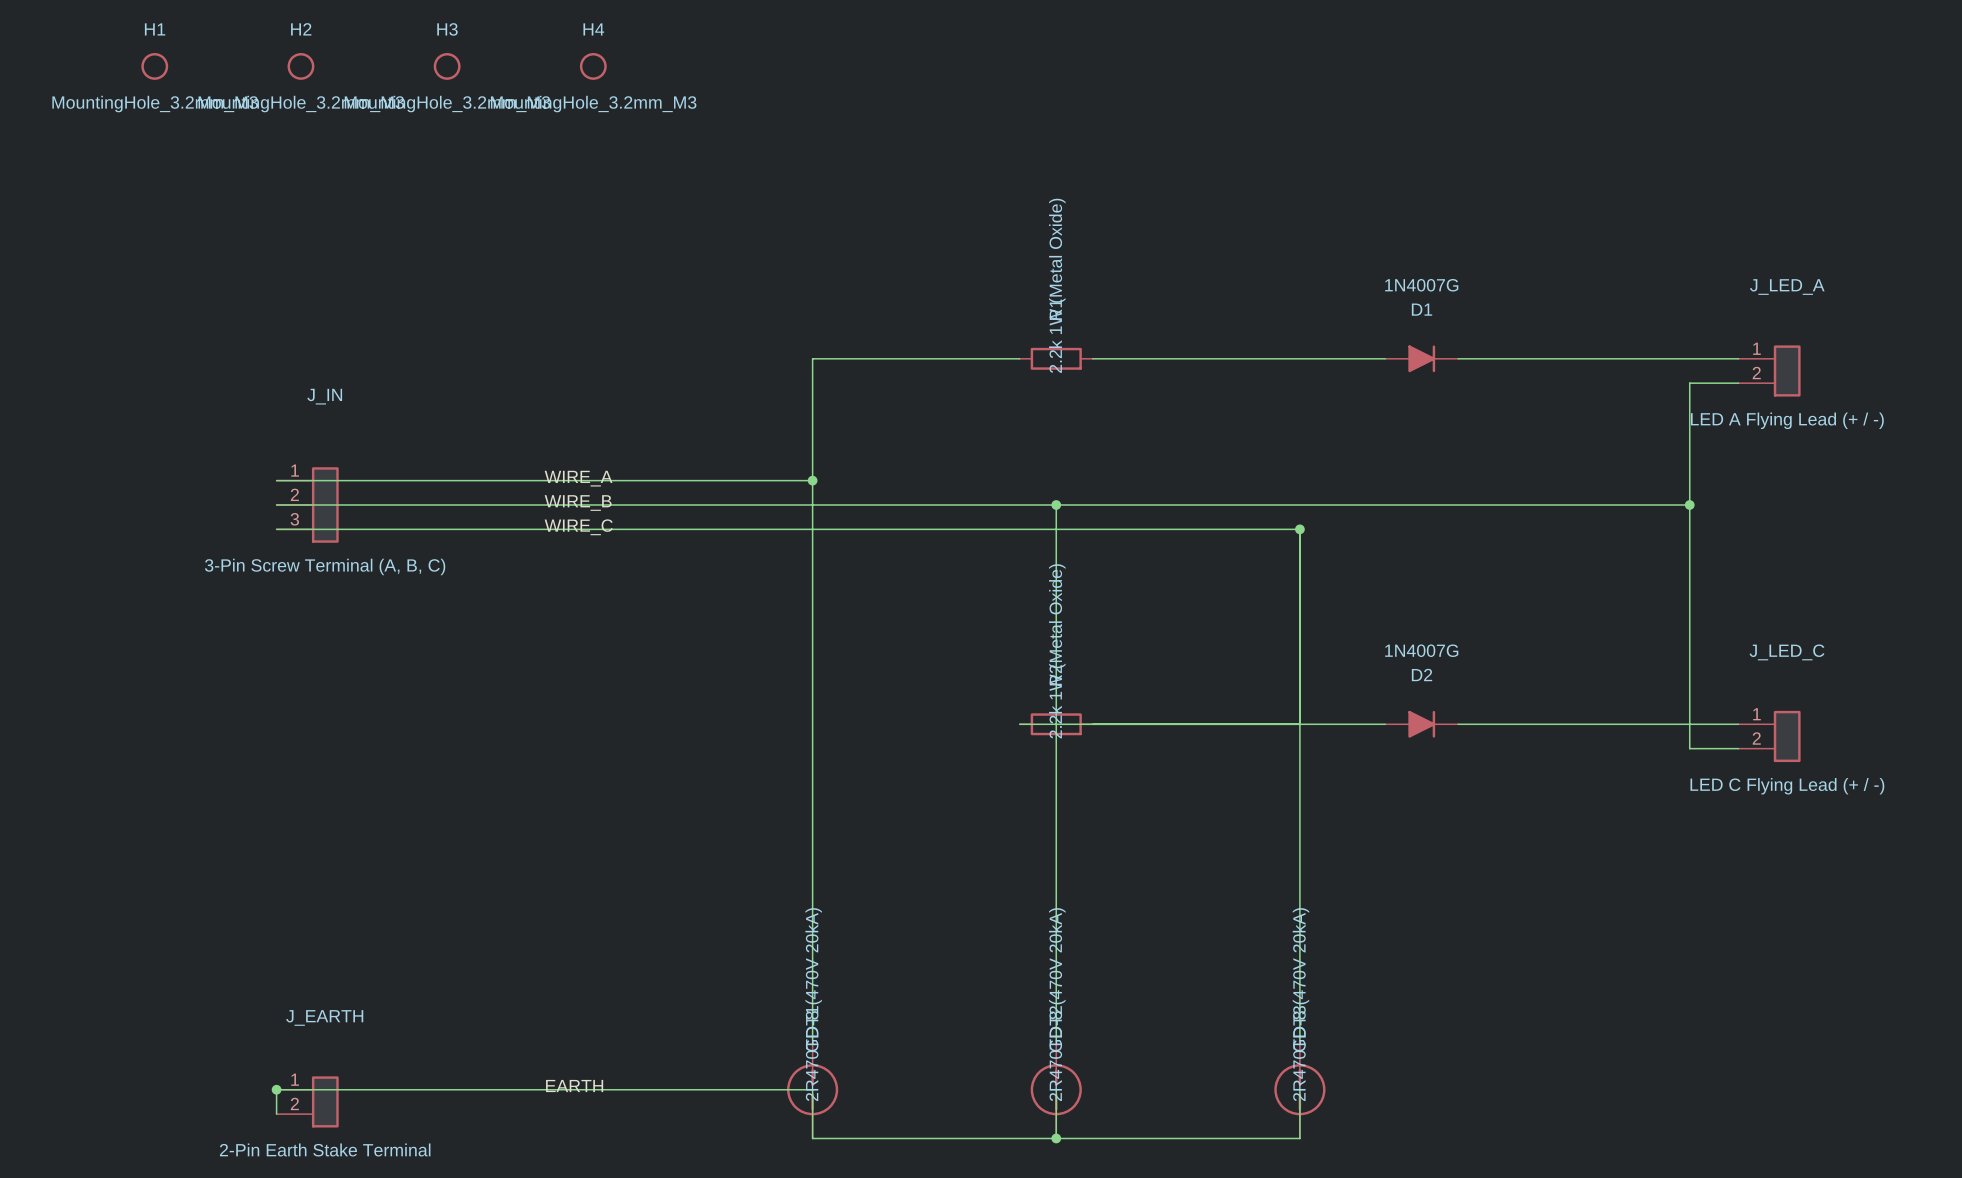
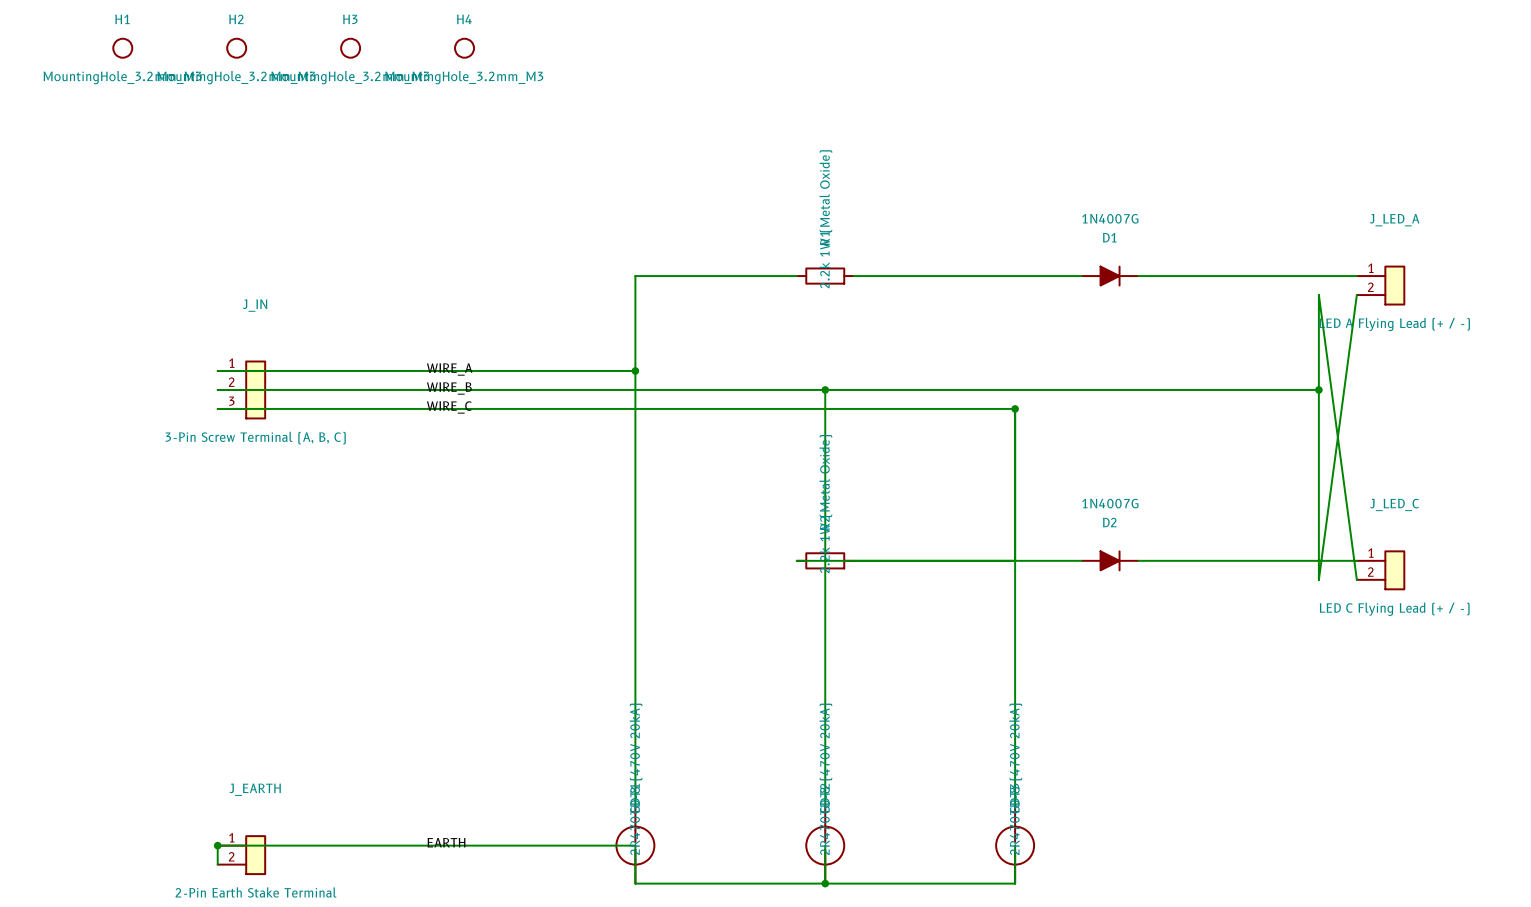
wire: (1689, 383) (1738, 383) -> (1318, 295) (1356, 579)
wire: (1689, 748) (1738, 748) -> (1318, 579) (1356, 295)

